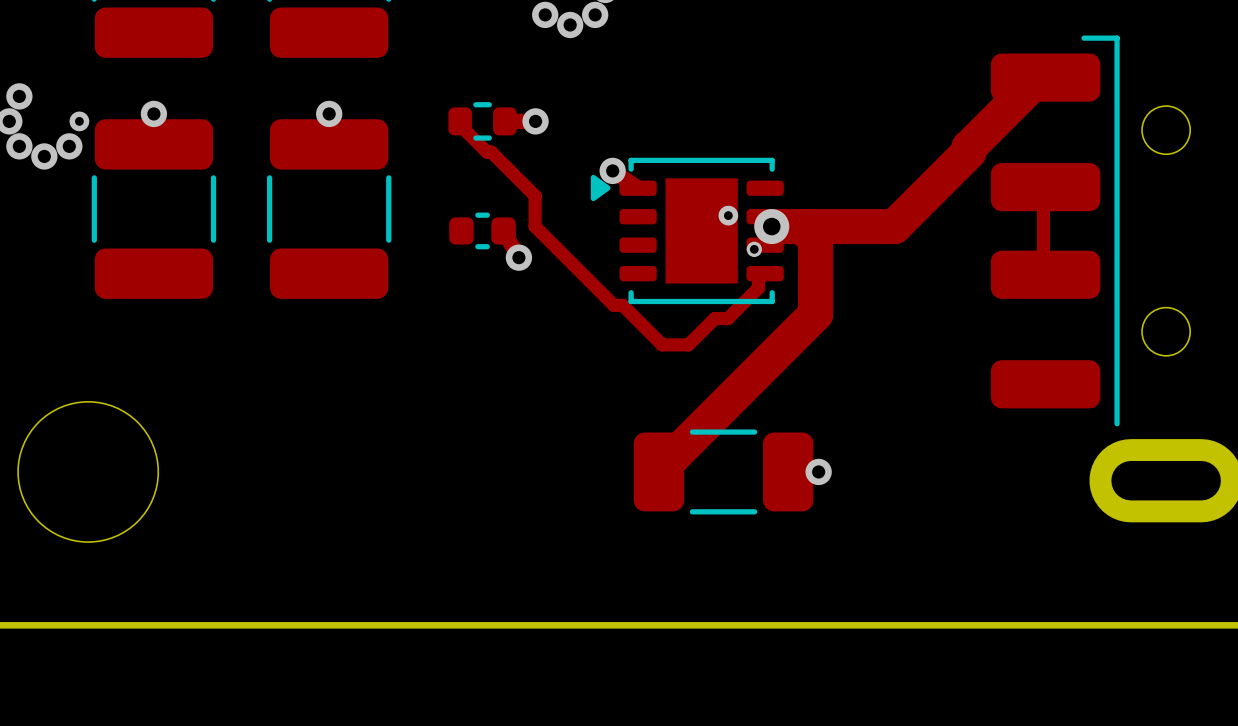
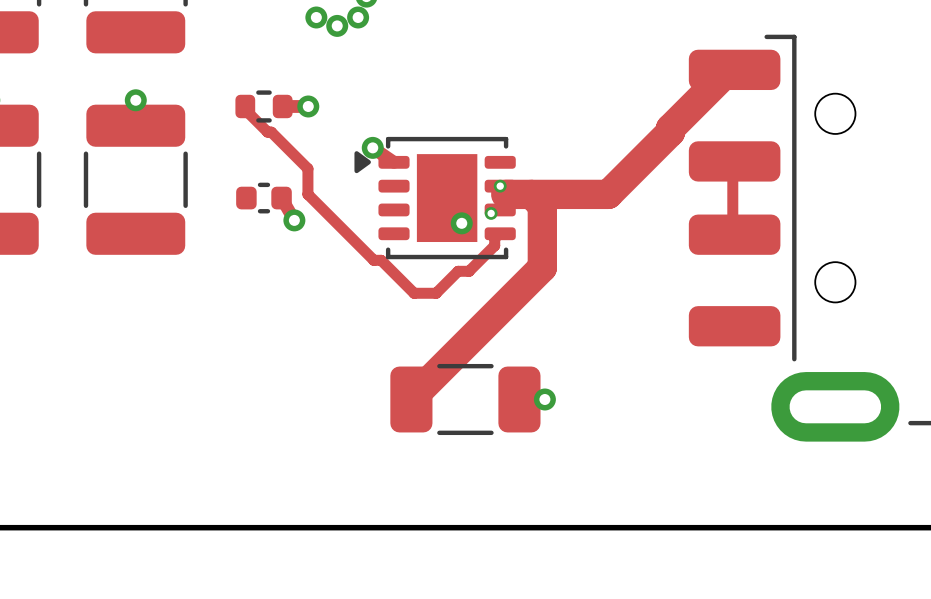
via size: [754, 209, 790, 245] -> [493, 179, 507, 193]
via: (728, 215) -> none
via: none -> (461, 223)

